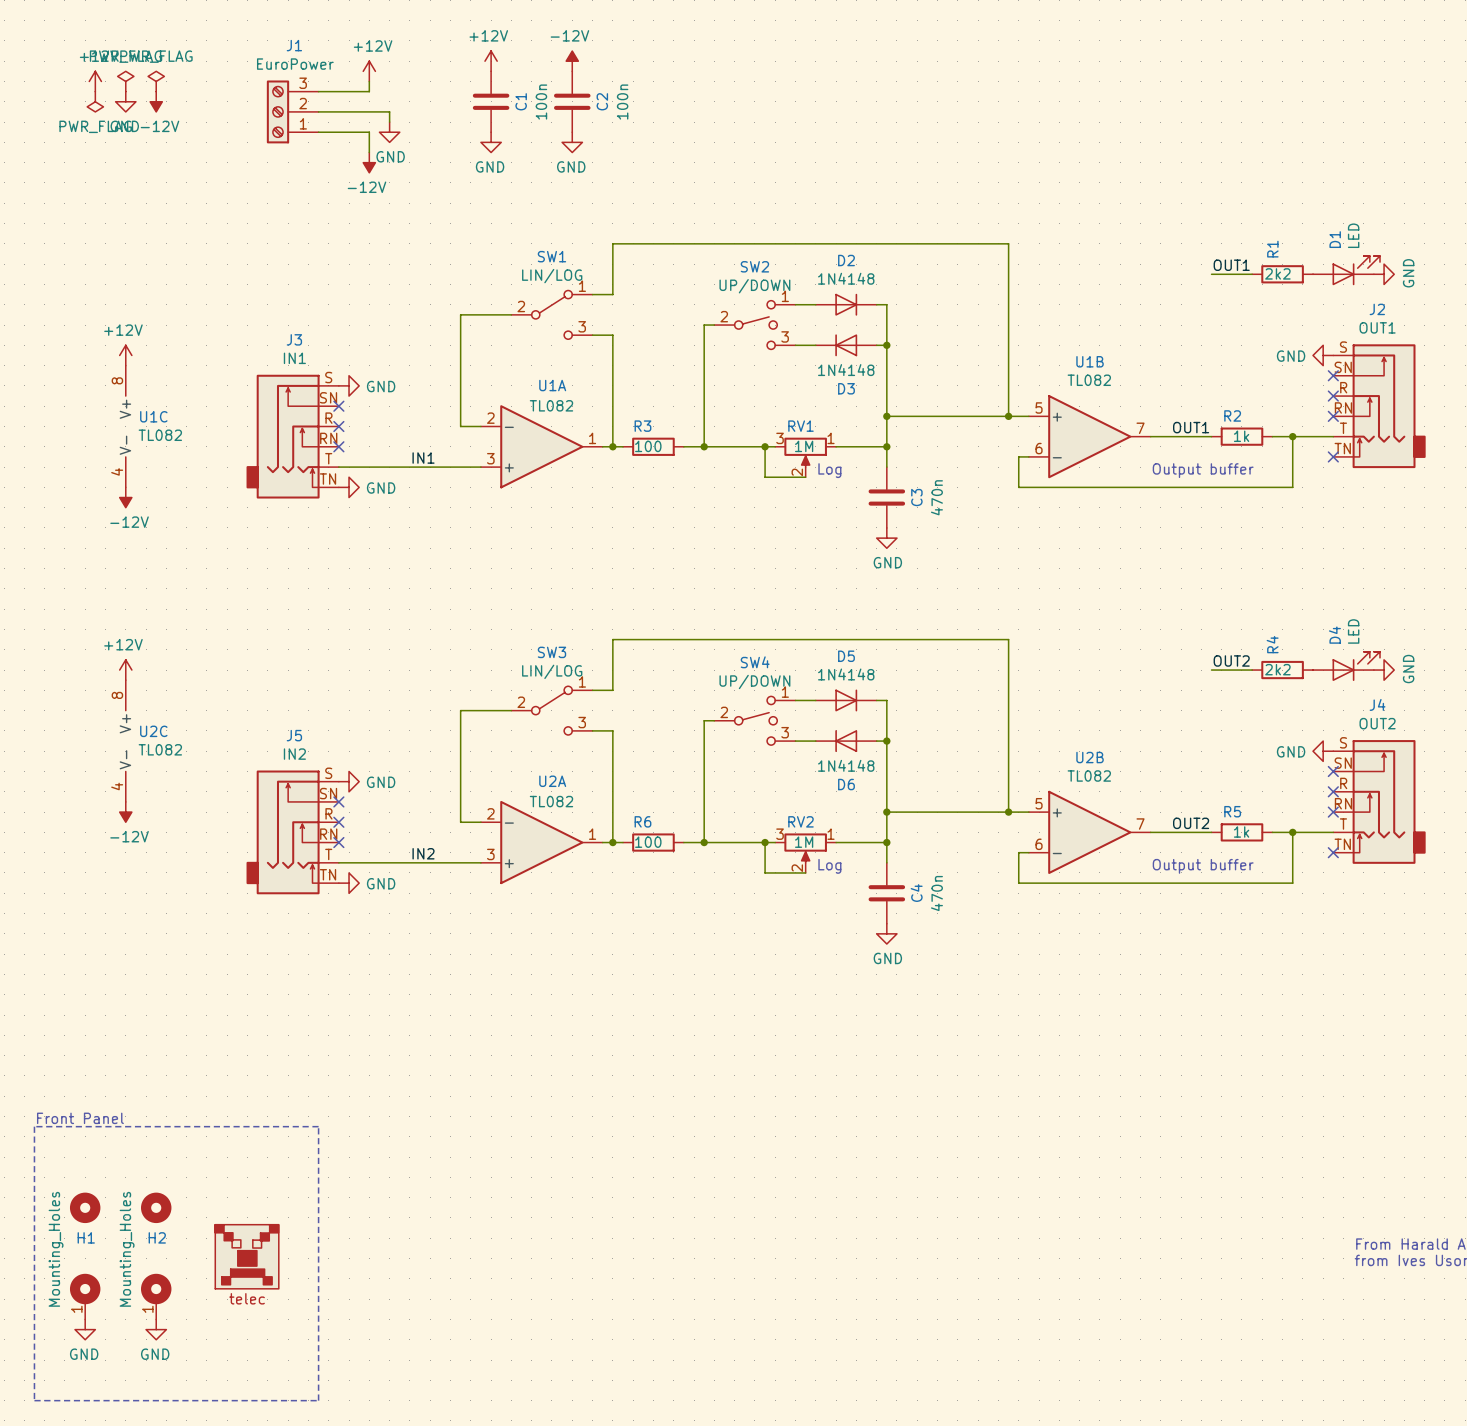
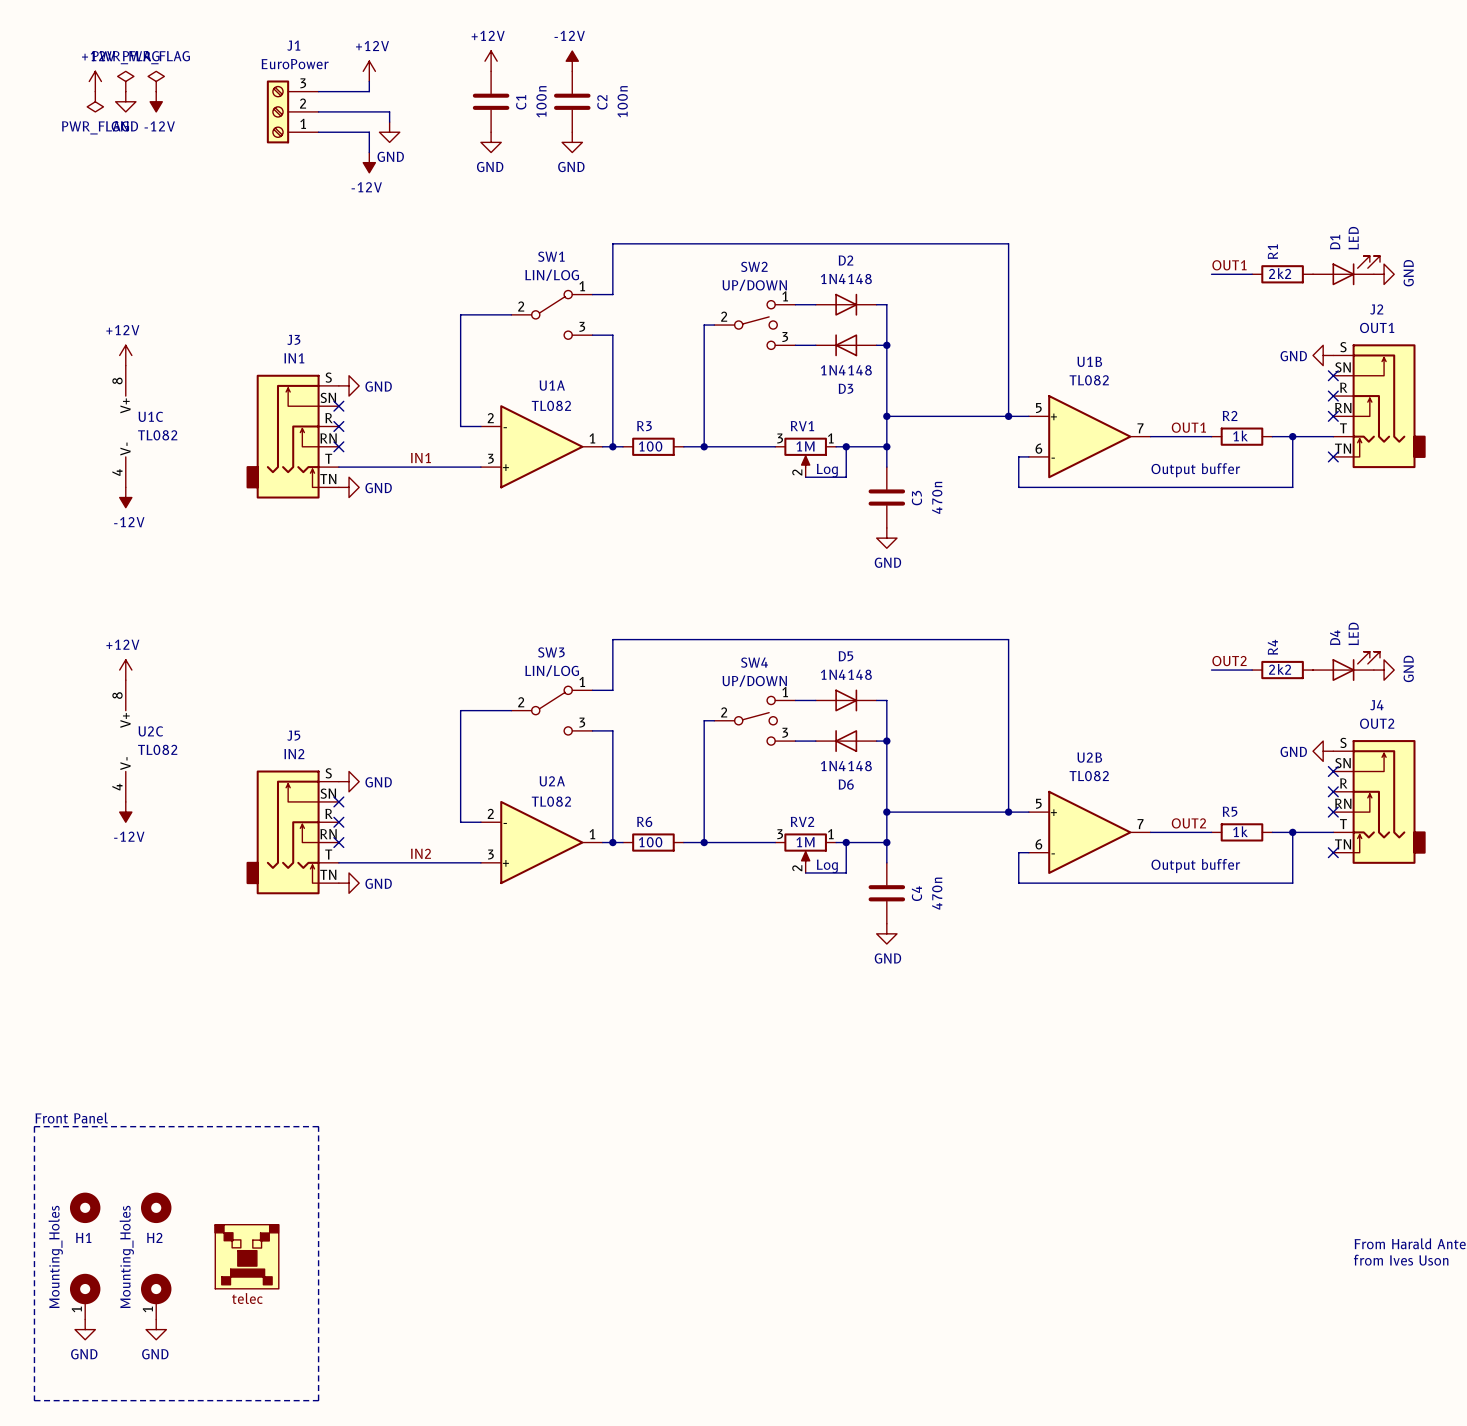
wire: (765, 446) (765, 477) (805, 477) -> (846, 446) (846, 477) (805, 477)
junction: (765, 446) -> none
junction: none -> (846, 446)
wire: (765, 842) (765, 872) (805, 872) -> (846, 842) (846, 872) (805, 872)
junction: (765, 842) -> none
junction: none -> (846, 842)

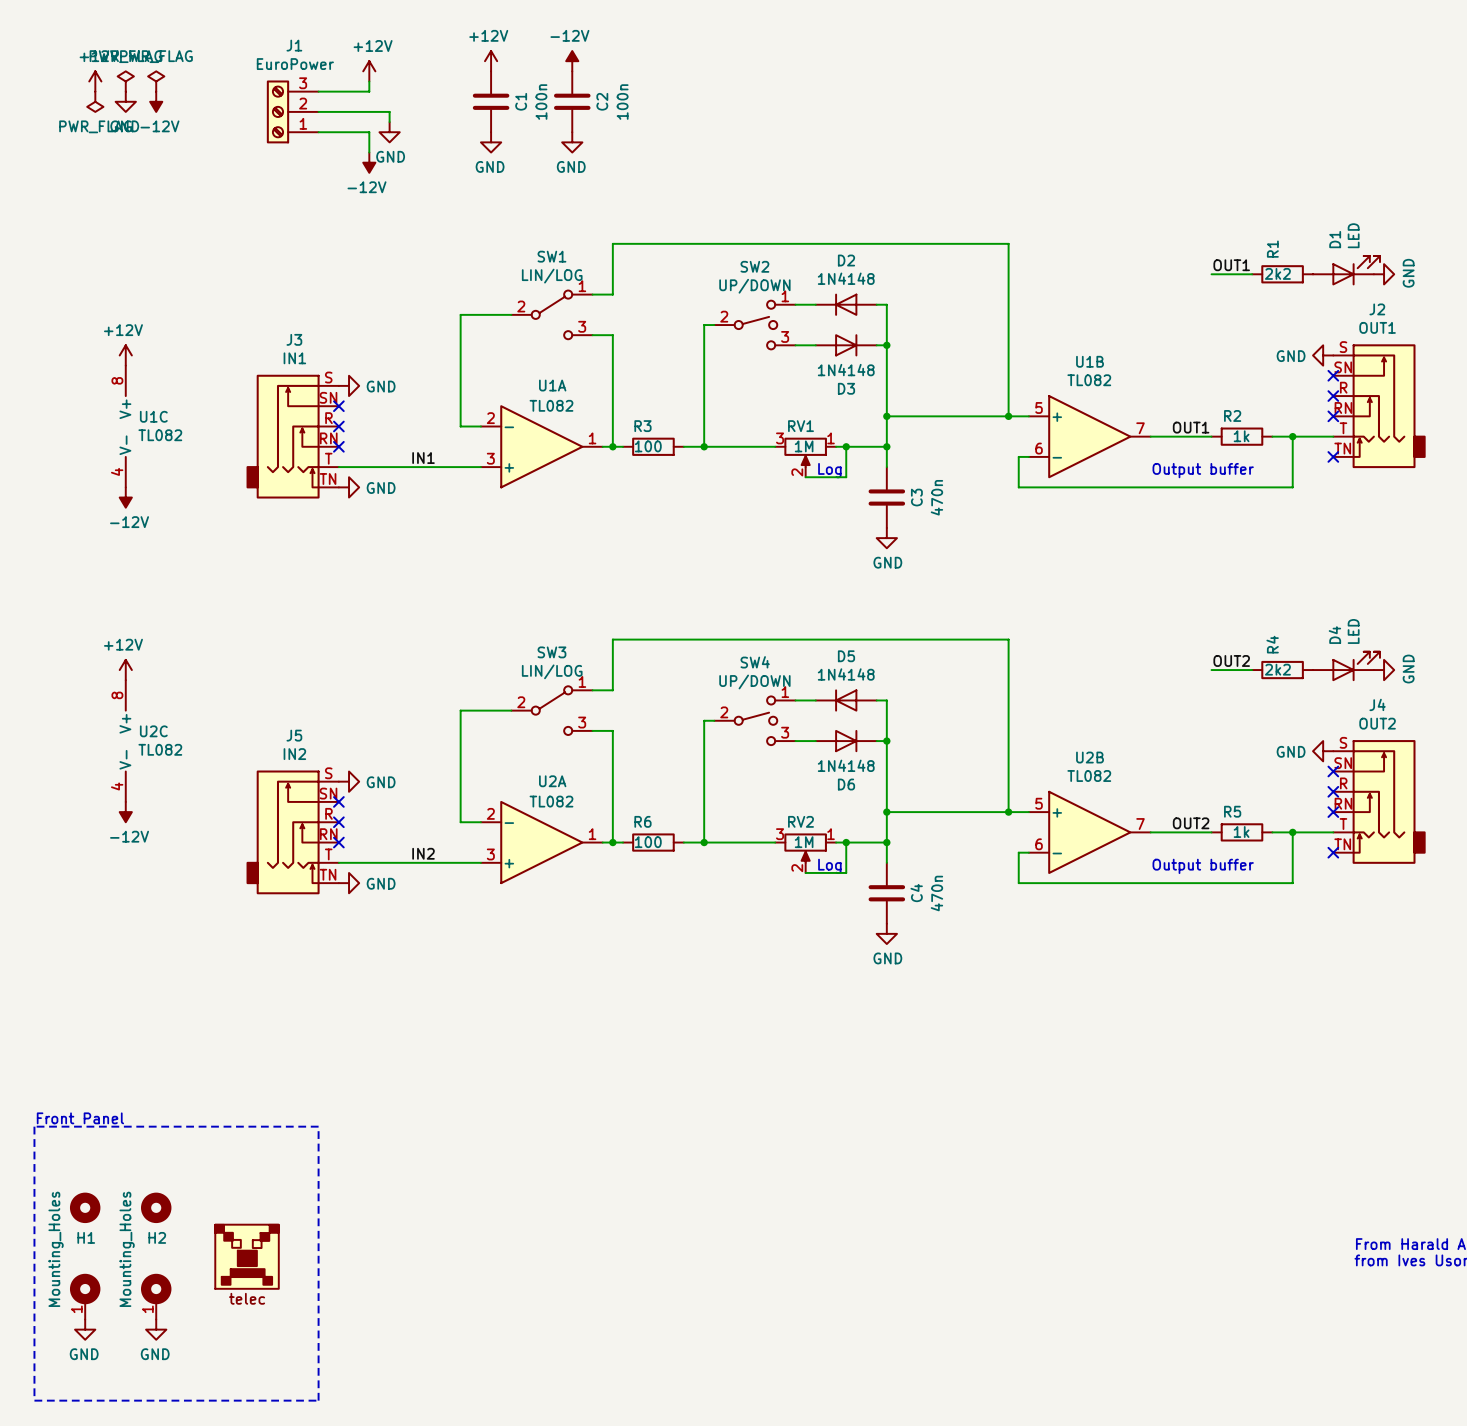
D2 rotation: 0° (846, 304) -> 180° (846, 304)
D3 rotation: 0° (846, 345) -> 180° (846, 345)
D5 rotation: 0° (846, 700) -> 180° (846, 700)
D6 rotation: 0° (846, 741) -> 180° (846, 741)

